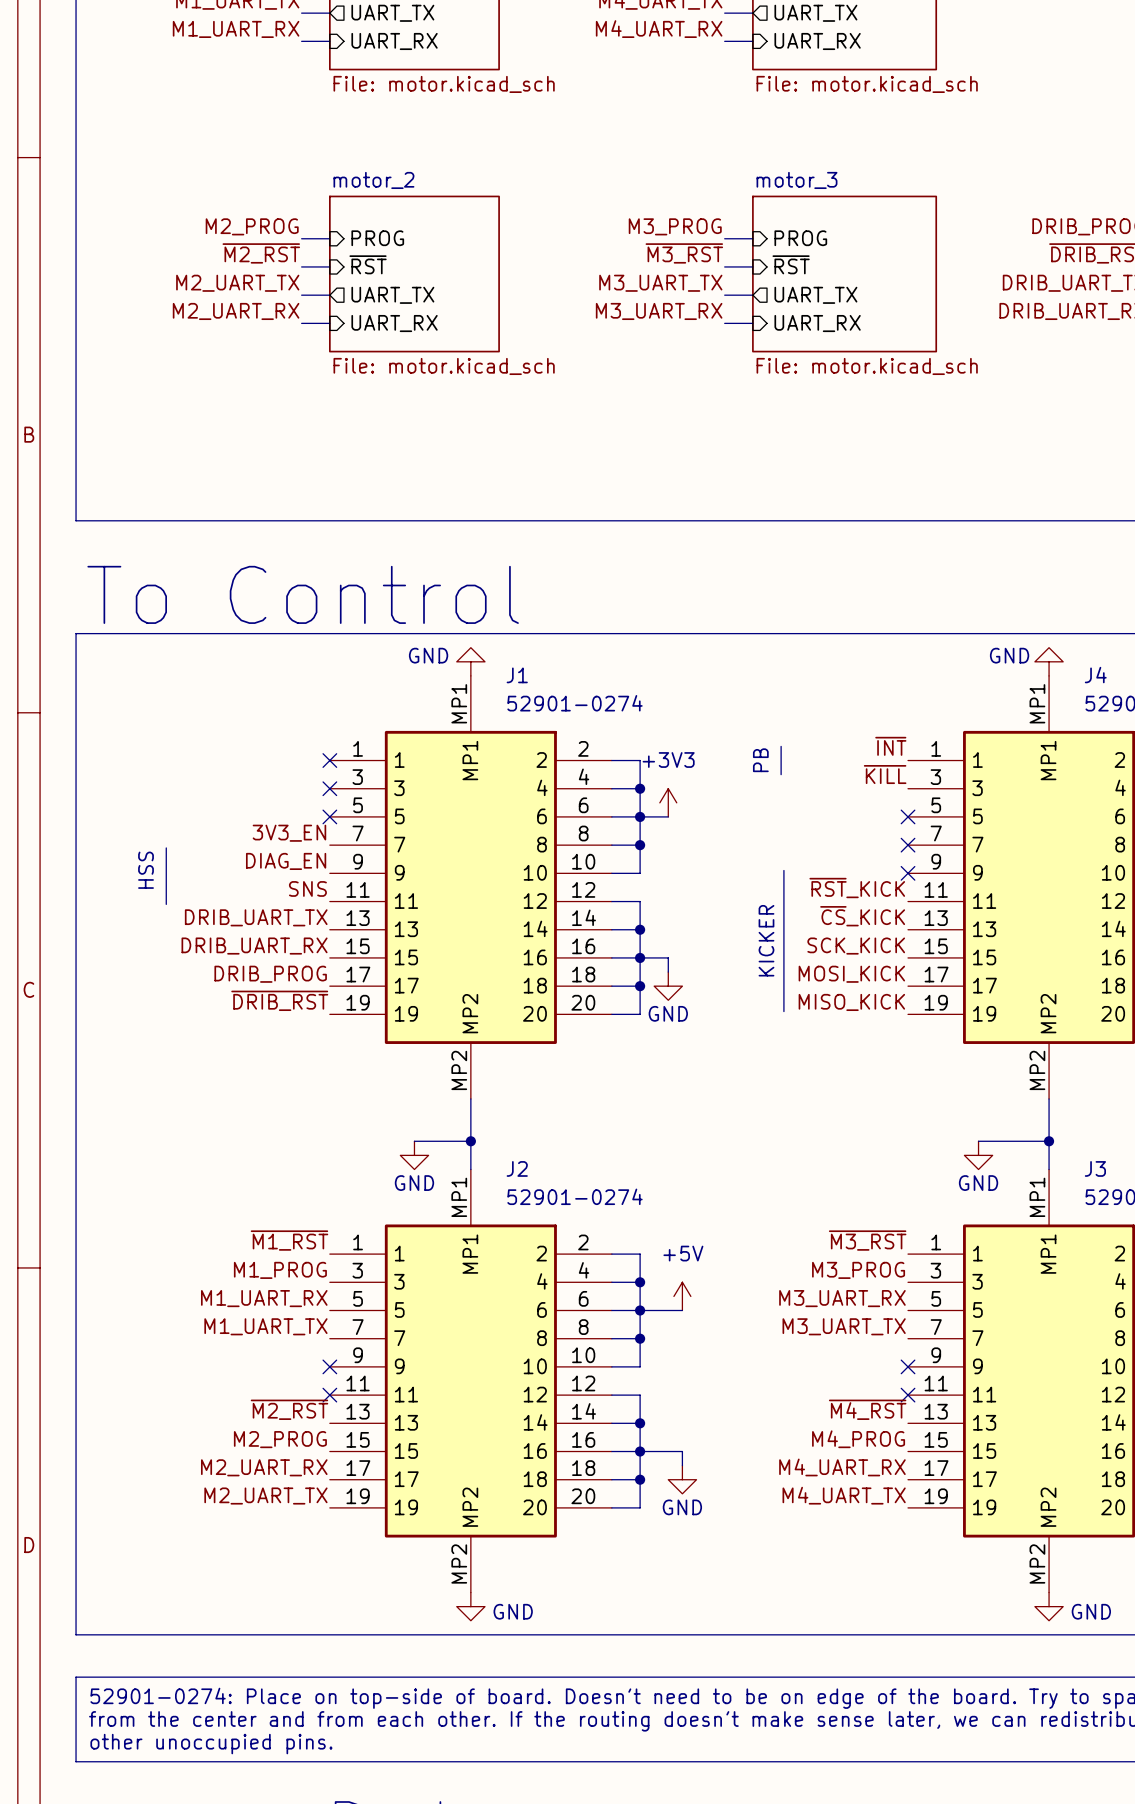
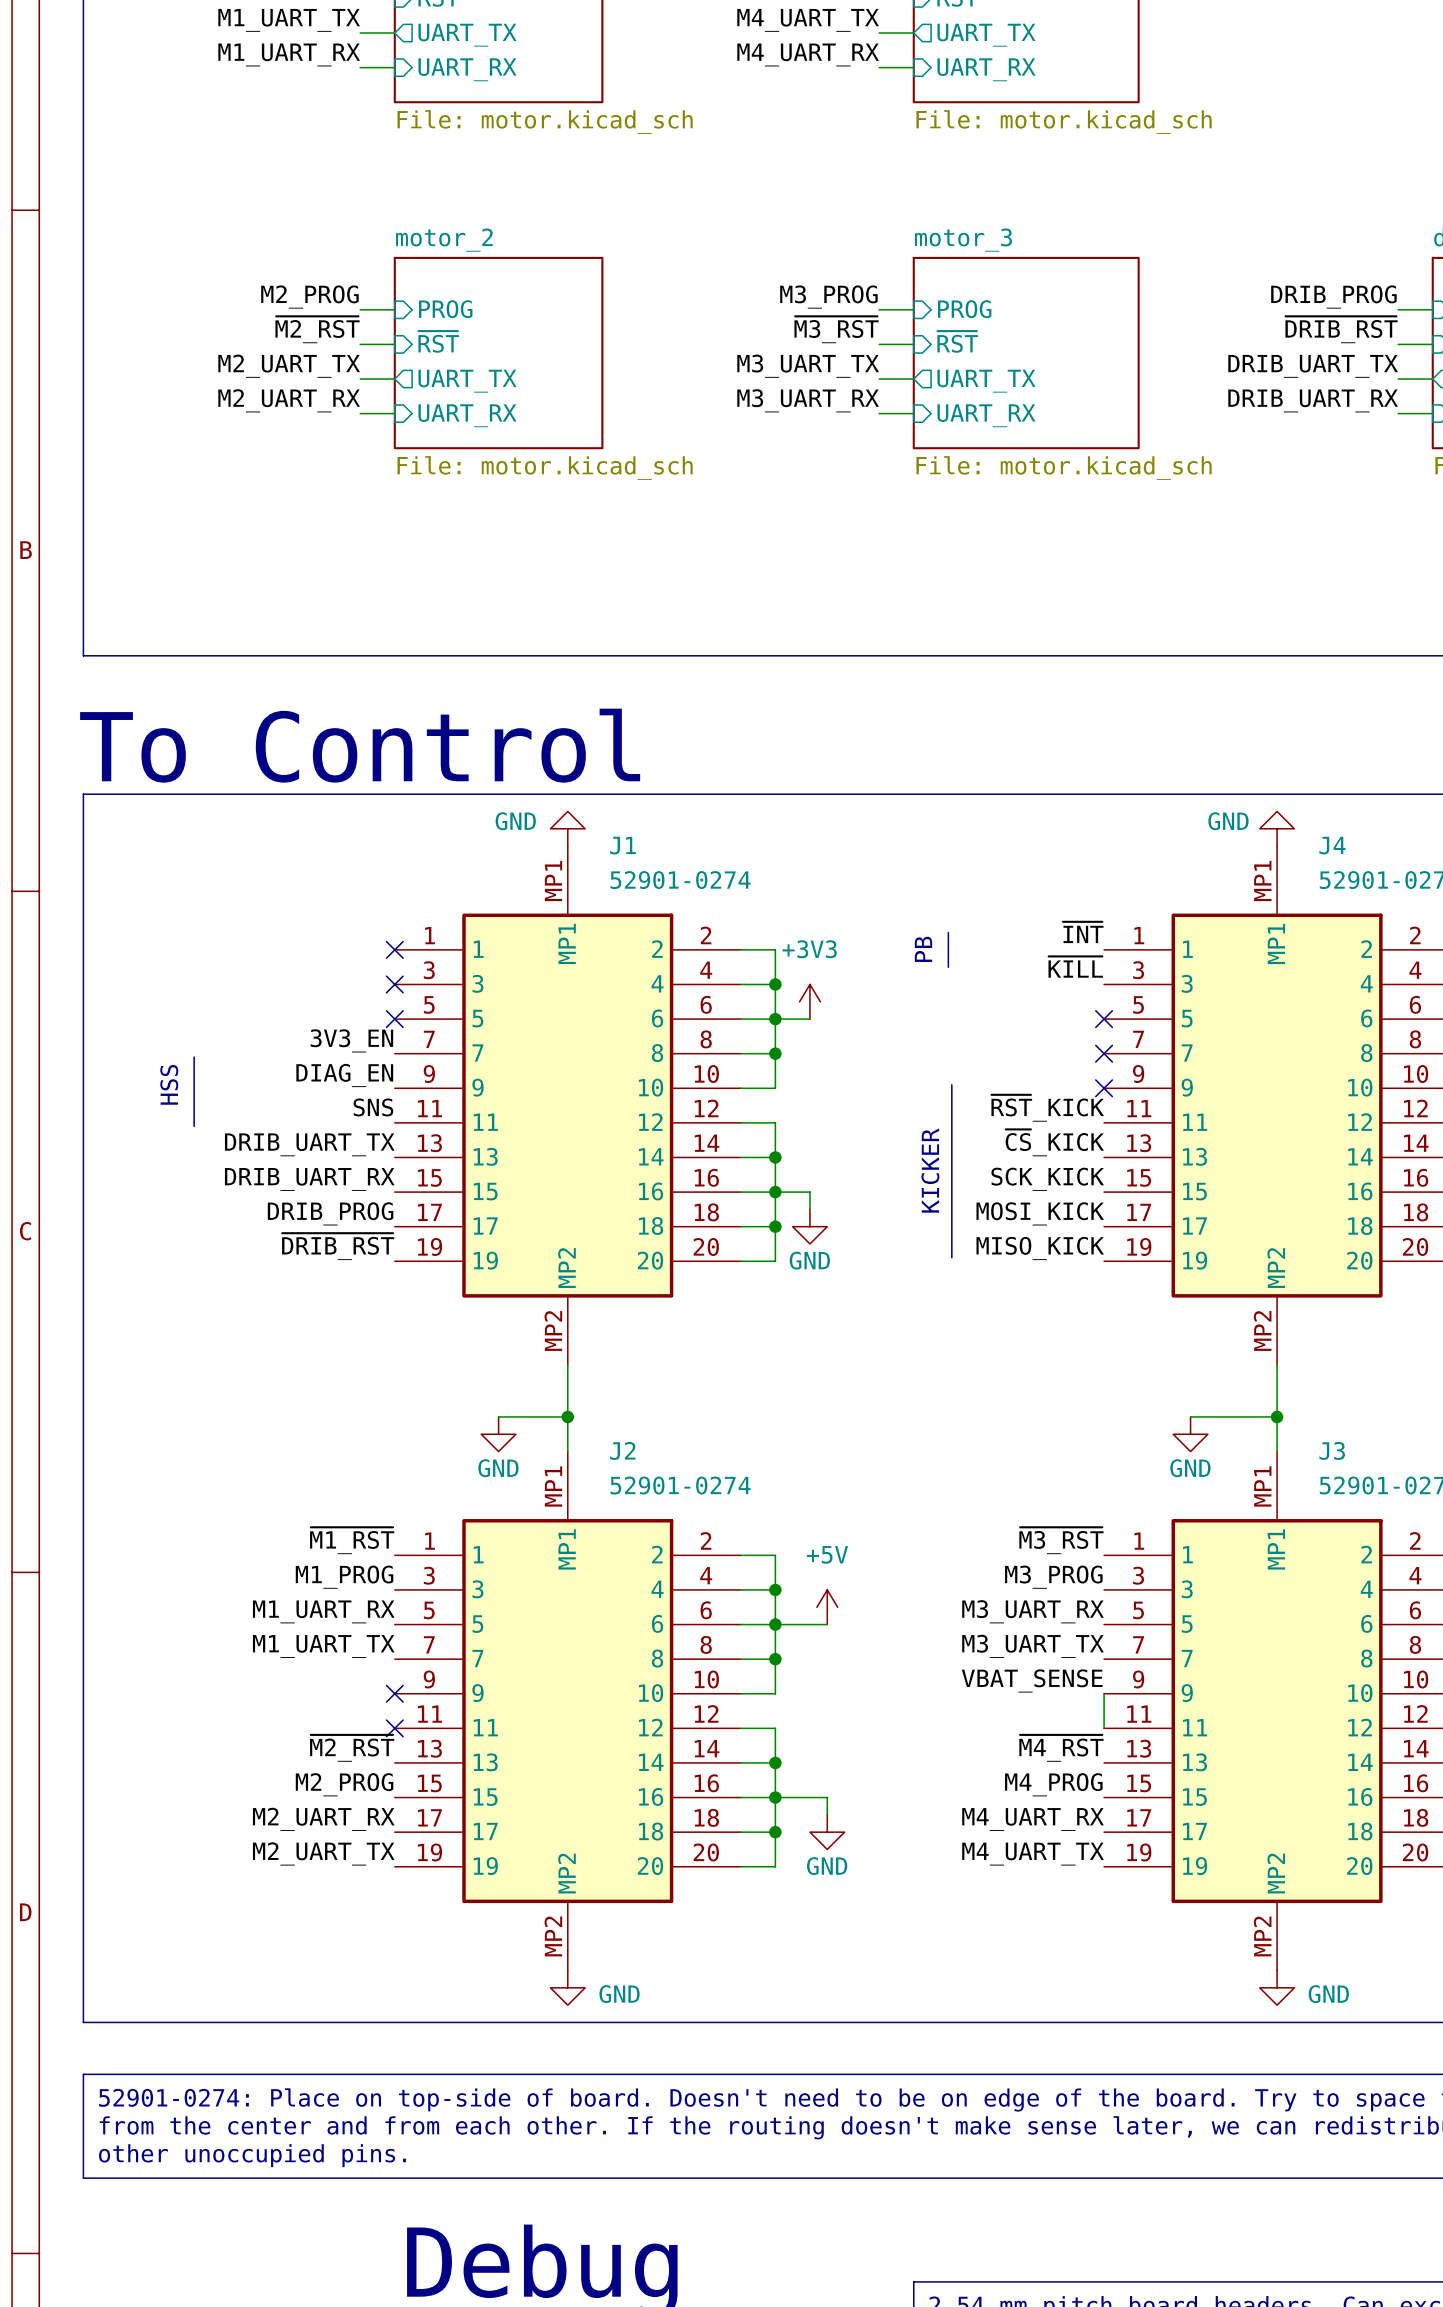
label: none -> VBAT_SENSE (1032, 1680)
wire: none -> (1104, 1693) (1104, 1728)
no-connect mark: (908, 1366) -> none
no-connect mark: (908, 1395) -> none

